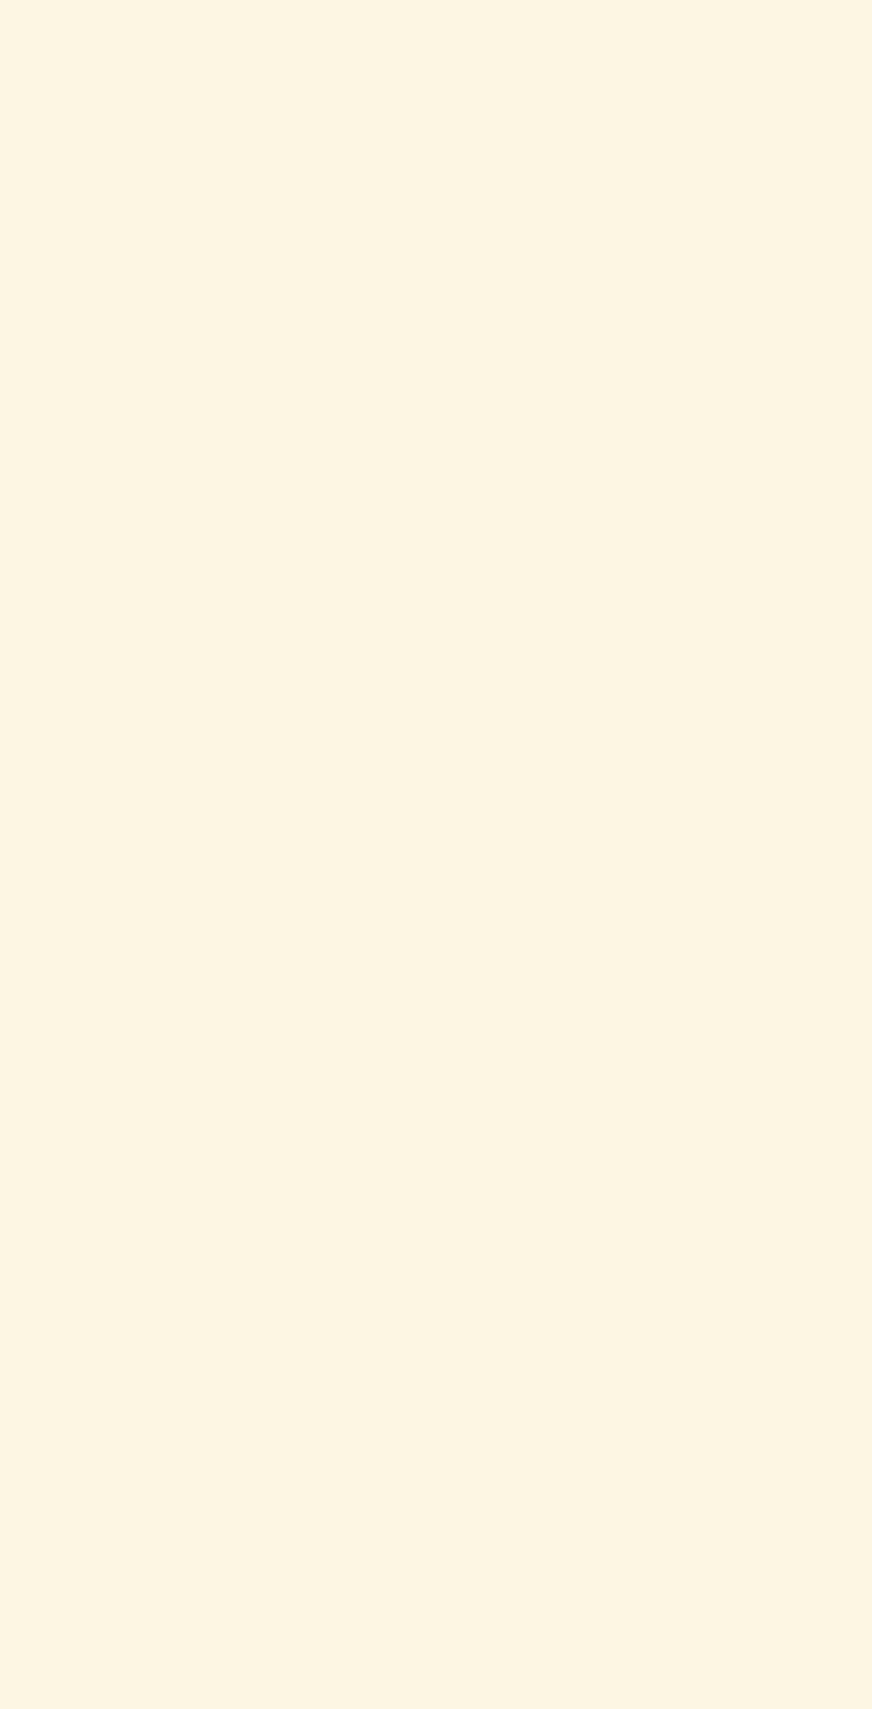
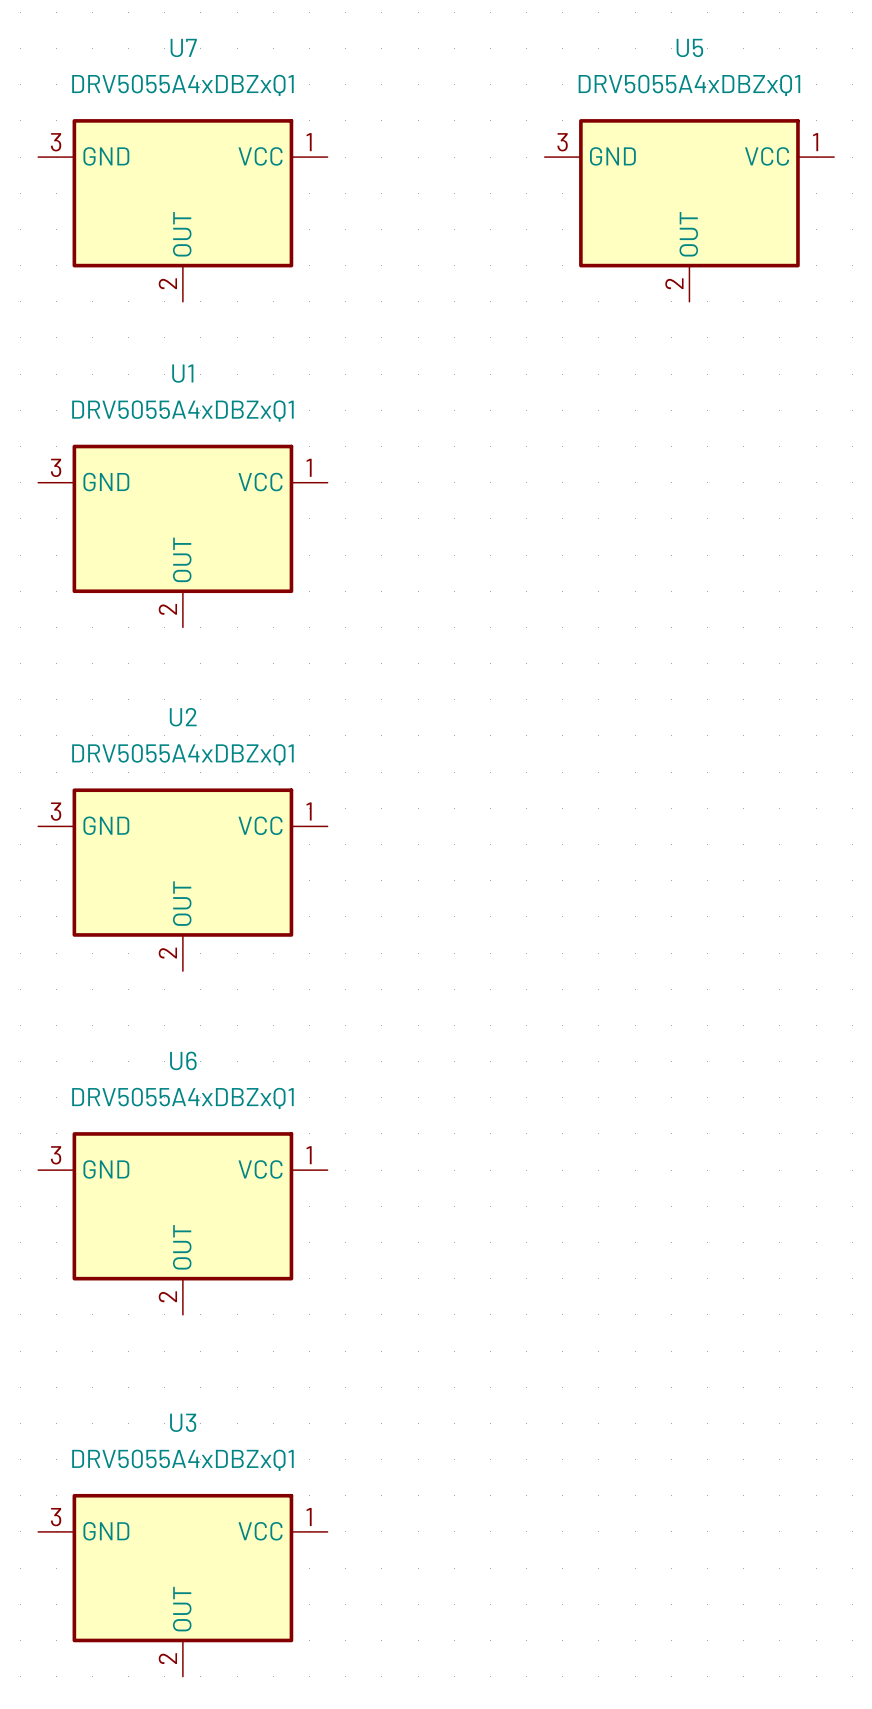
U7: none -> DRV5055A4xDBZxQ1 (182, 210)
U5: none -> DRV5055A4xDBZxQ1 (689, 210)
U1: none -> DRV5055A4xDBZxQ1 (182, 536)
U2: none -> DRV5055A4xDBZxQ1 (182, 879)
U6: none -> DRV5055A4xDBZxQ1 (182, 1223)
U3: none -> DRV5055A4xDBZxQ1 (182, 1585)

